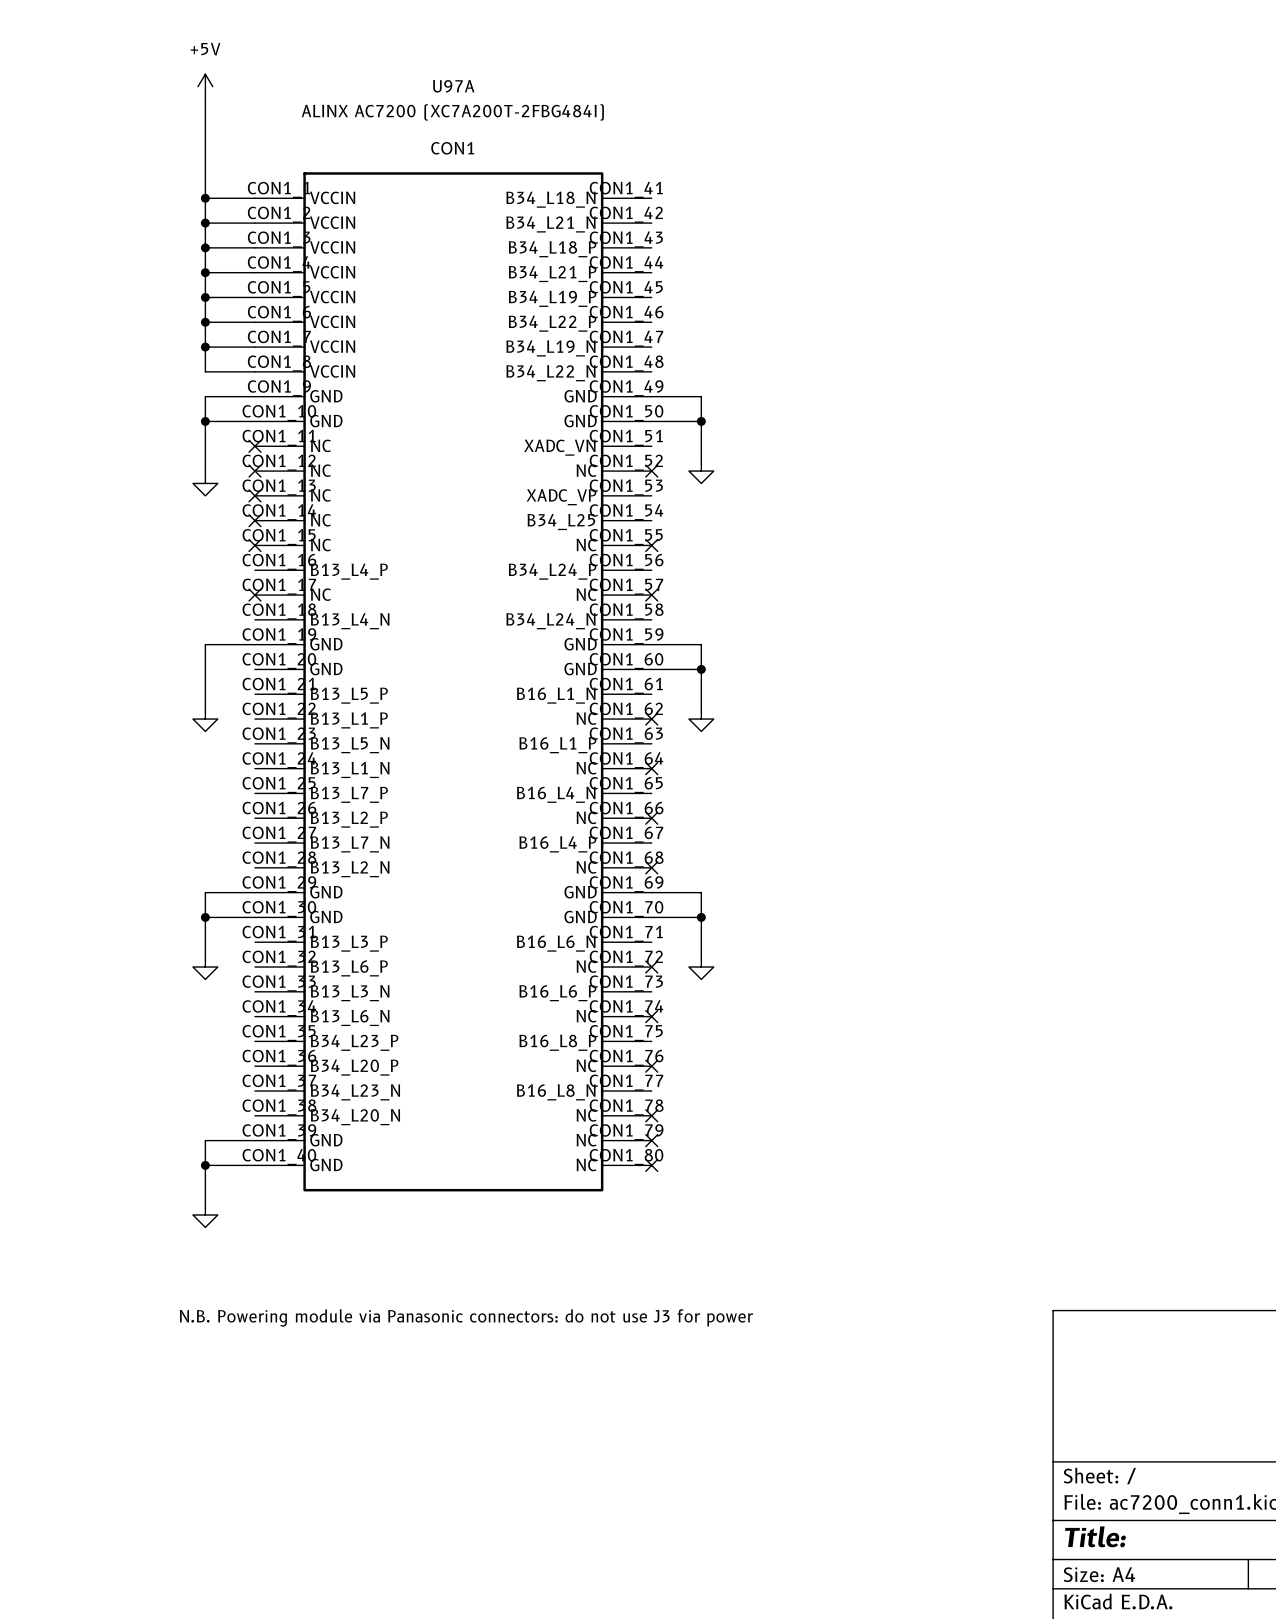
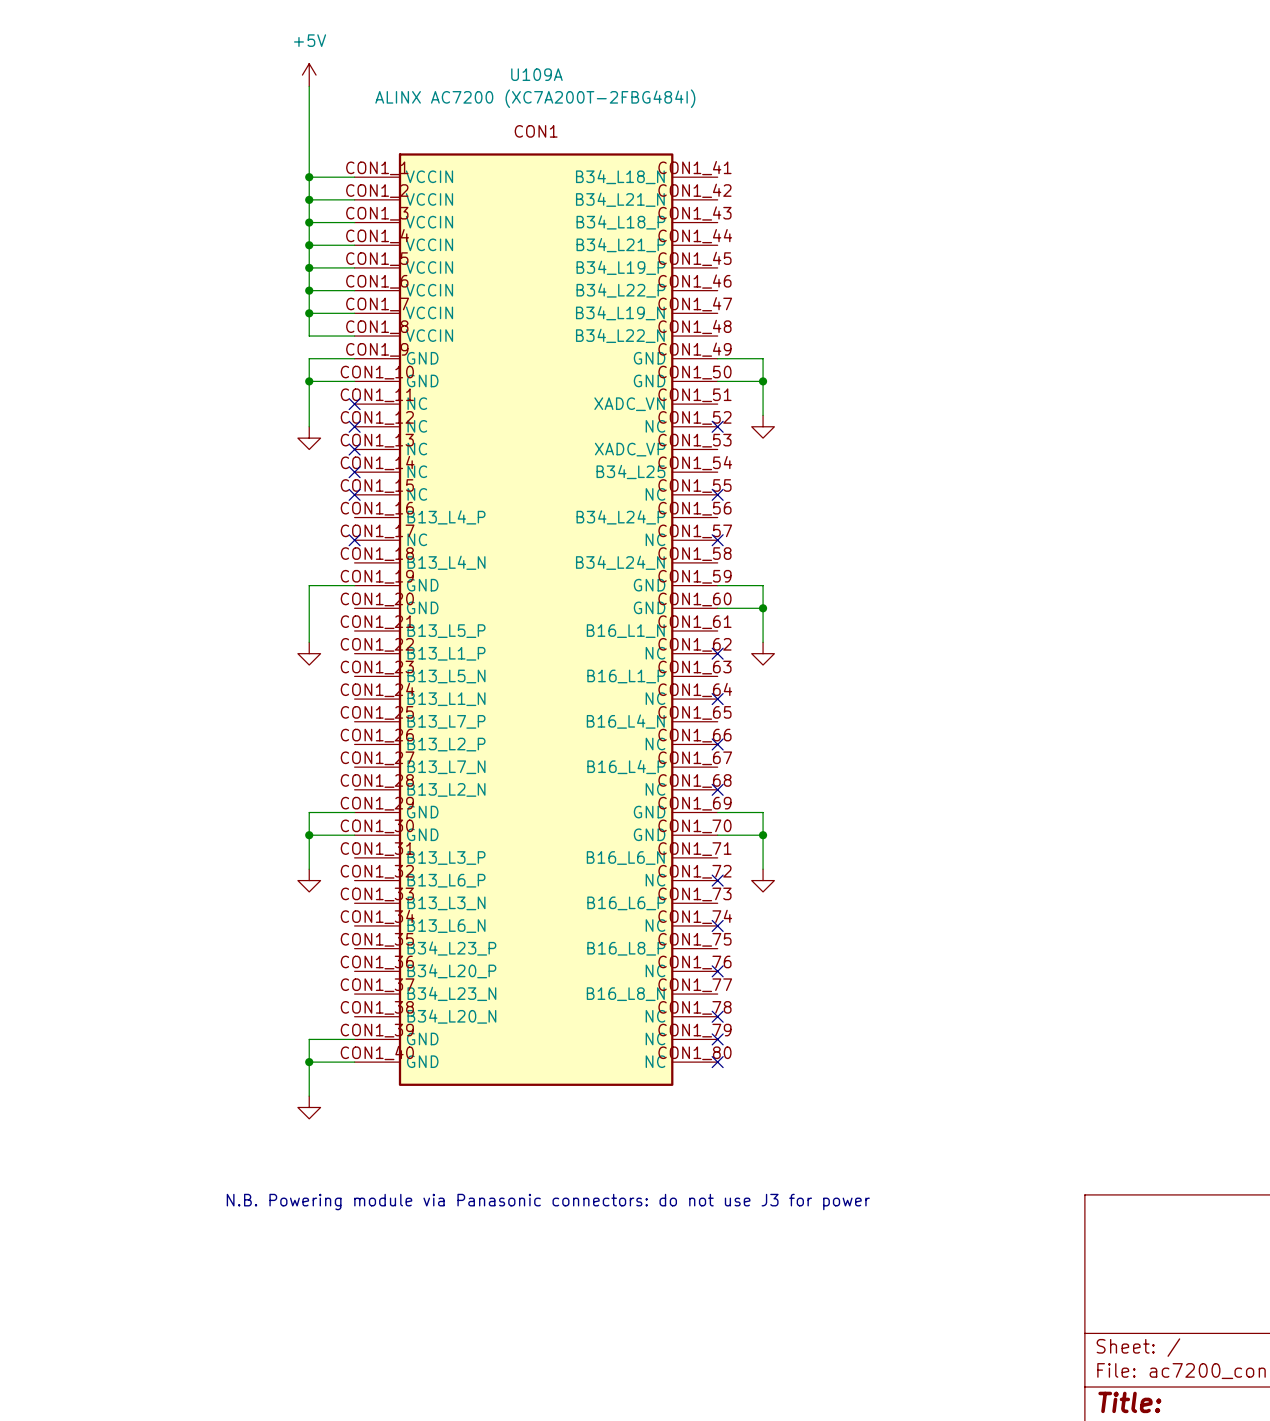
U97A name: U97A (453, 86) -> U109A (536, 74)

